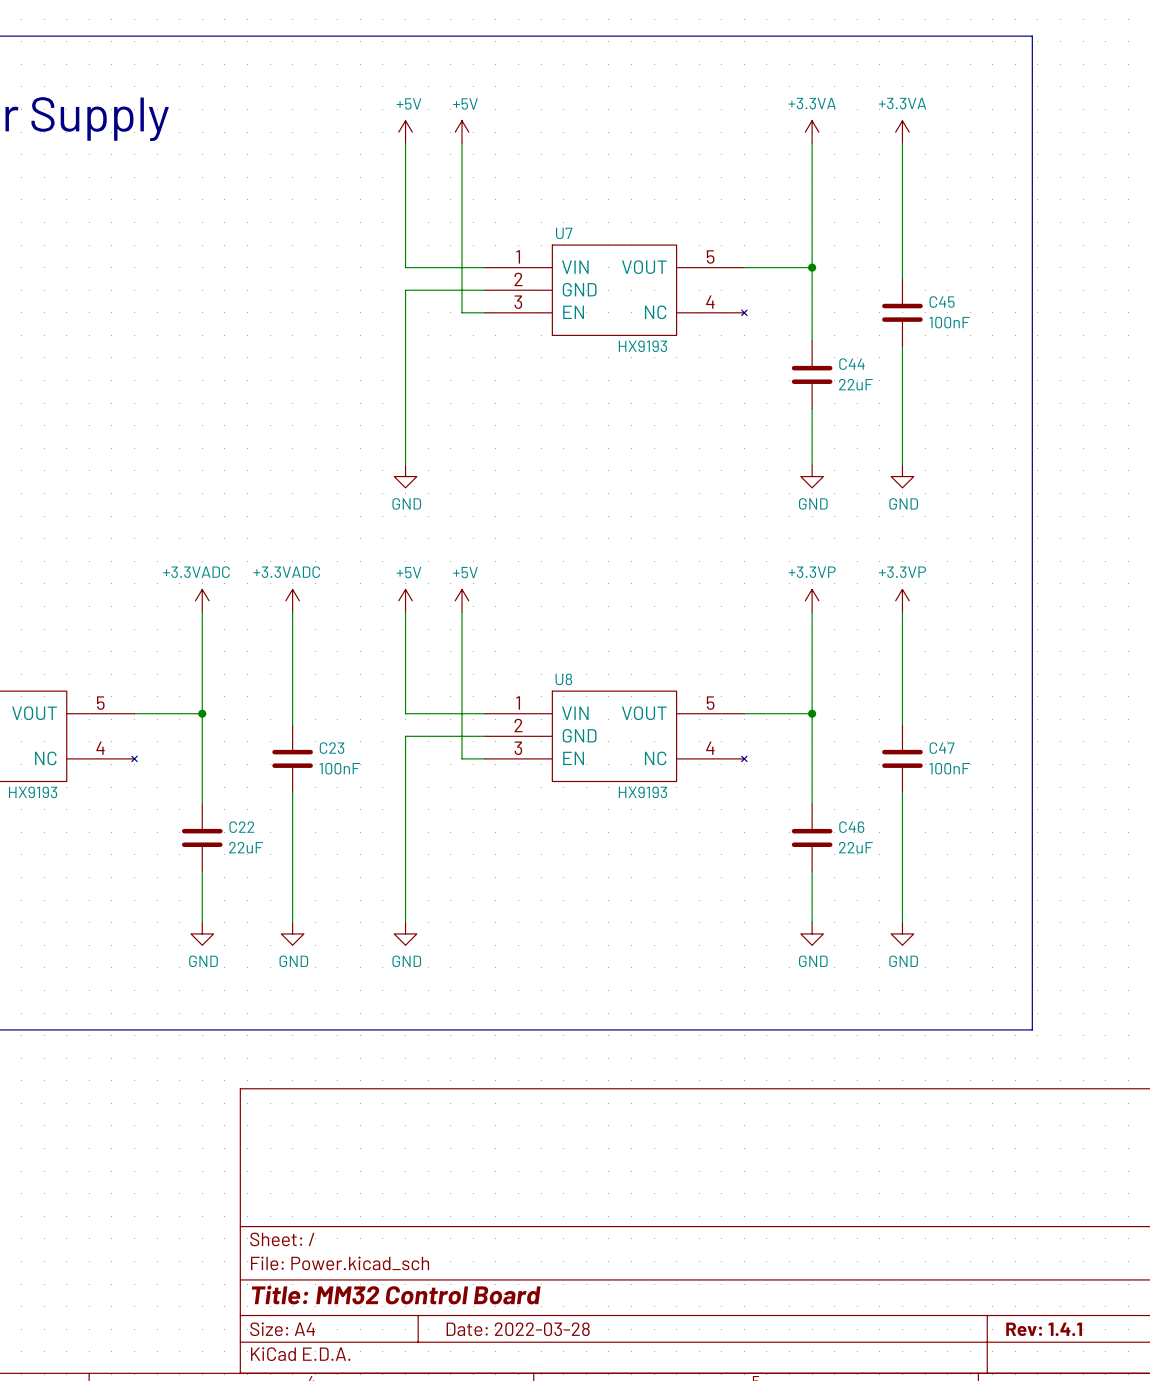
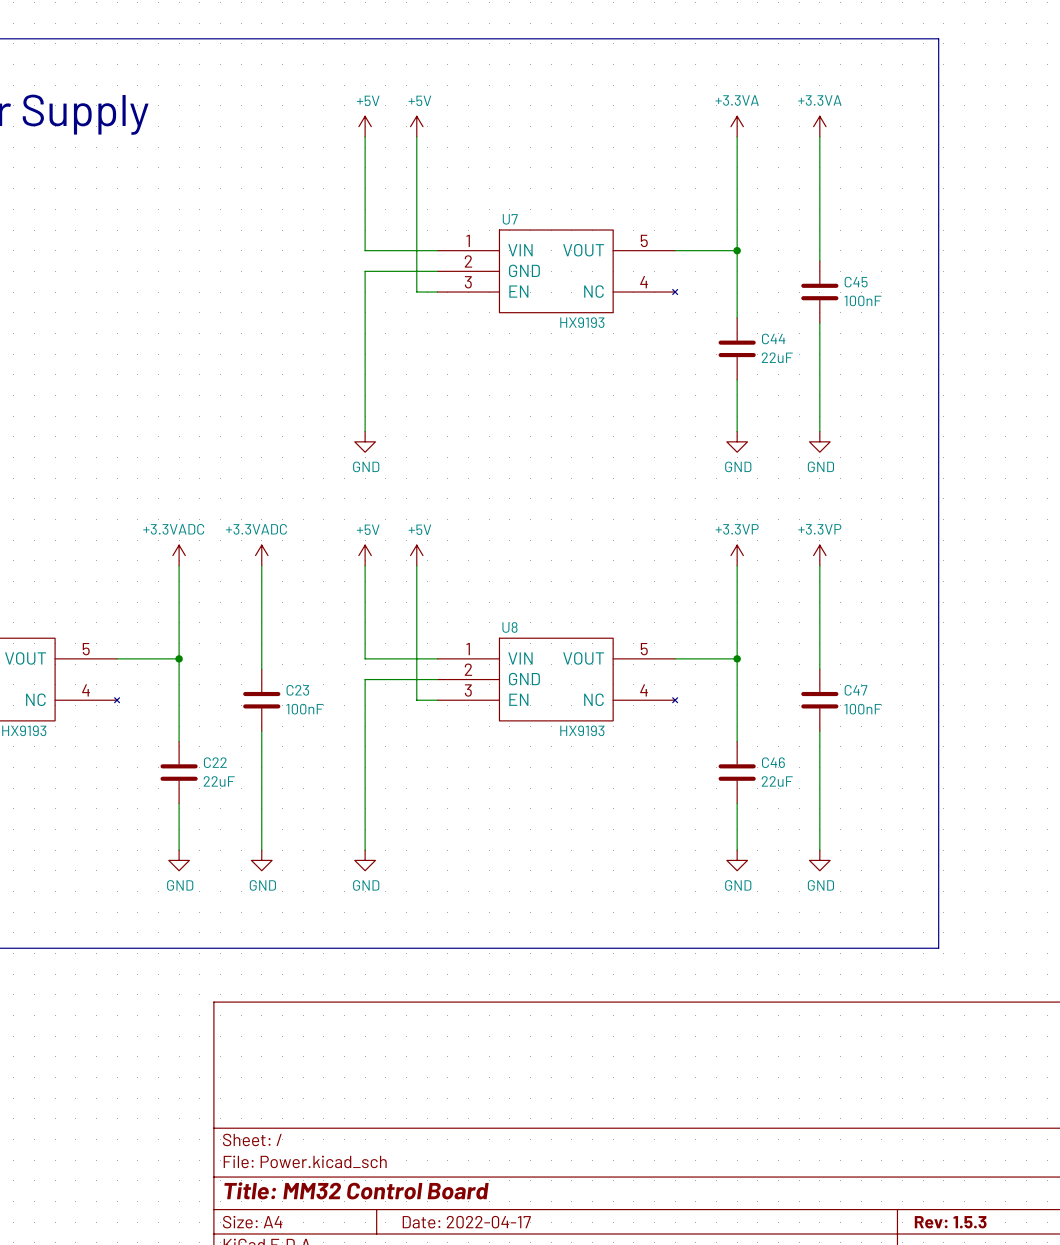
title block: Date: 2022-03-28 (518, 1329) -> Date: 2022-04-17 (466, 1222)
title block: Rev: 1.4.1 (1044, 1329) -> Rev: 1.5.3 (950, 1222)

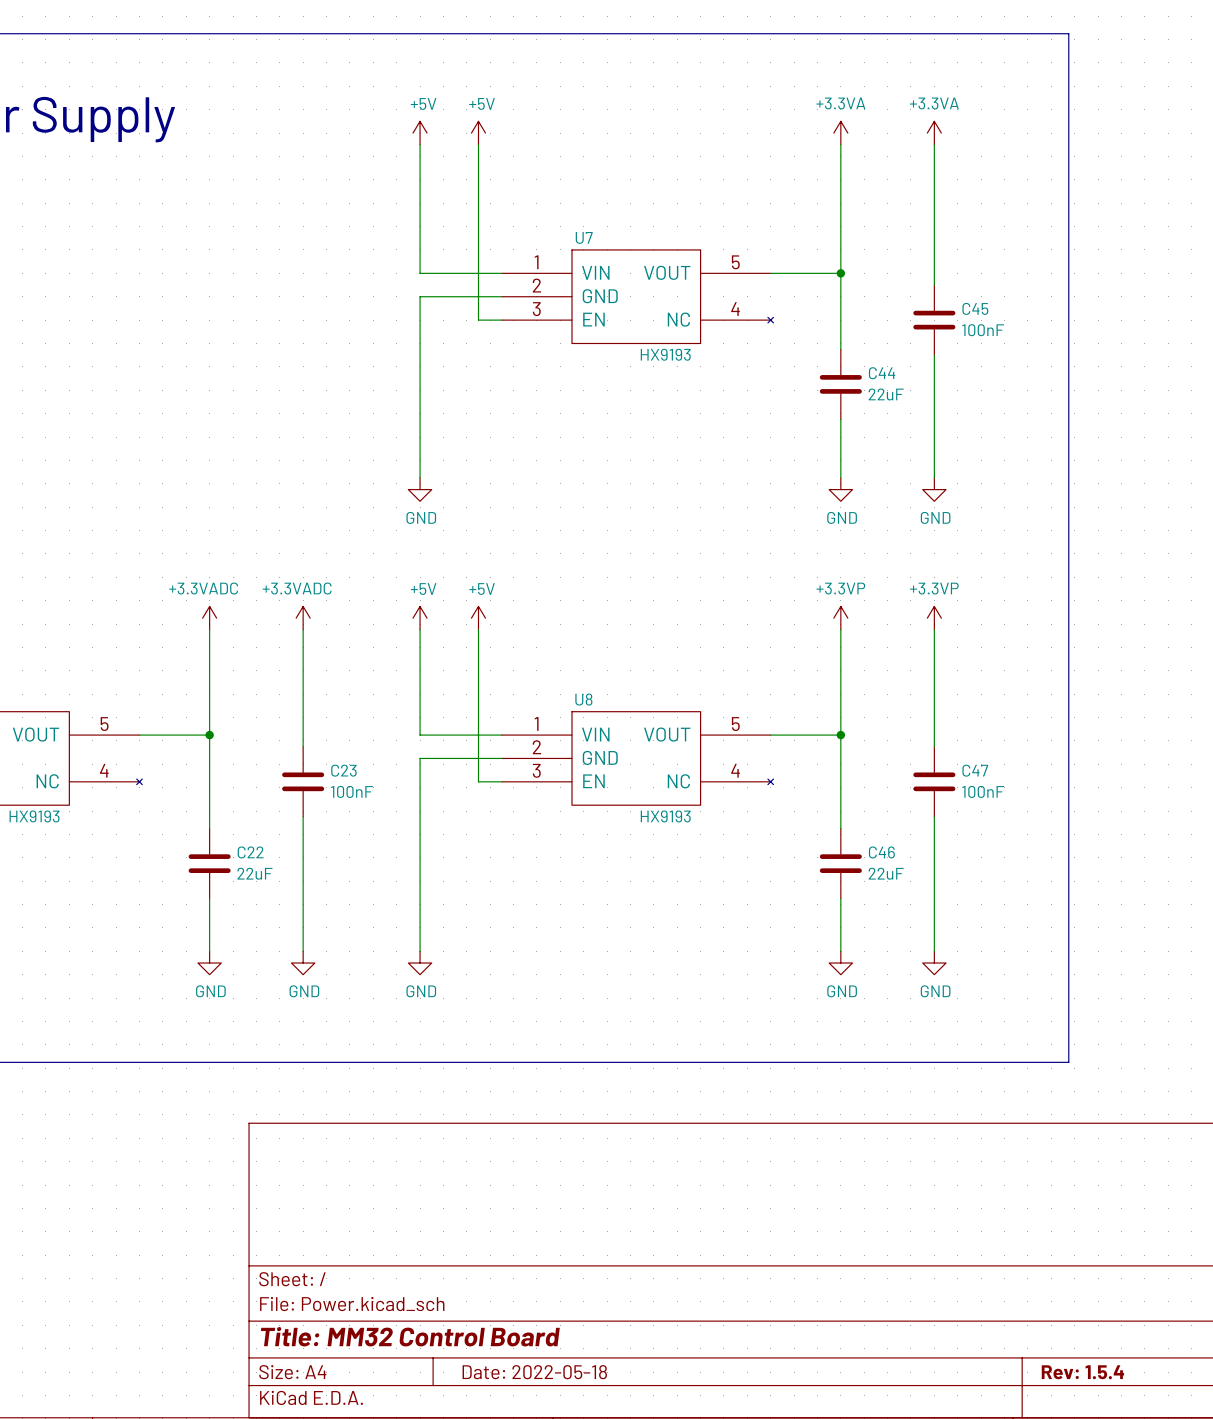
title block: Date: 2022-04-17 (466, 1222) -> Date: 2022-05-18 (534, 1372)
title block: Rev: 1.5.3 (950, 1222) -> Rev: 1.5.4 (1082, 1372)

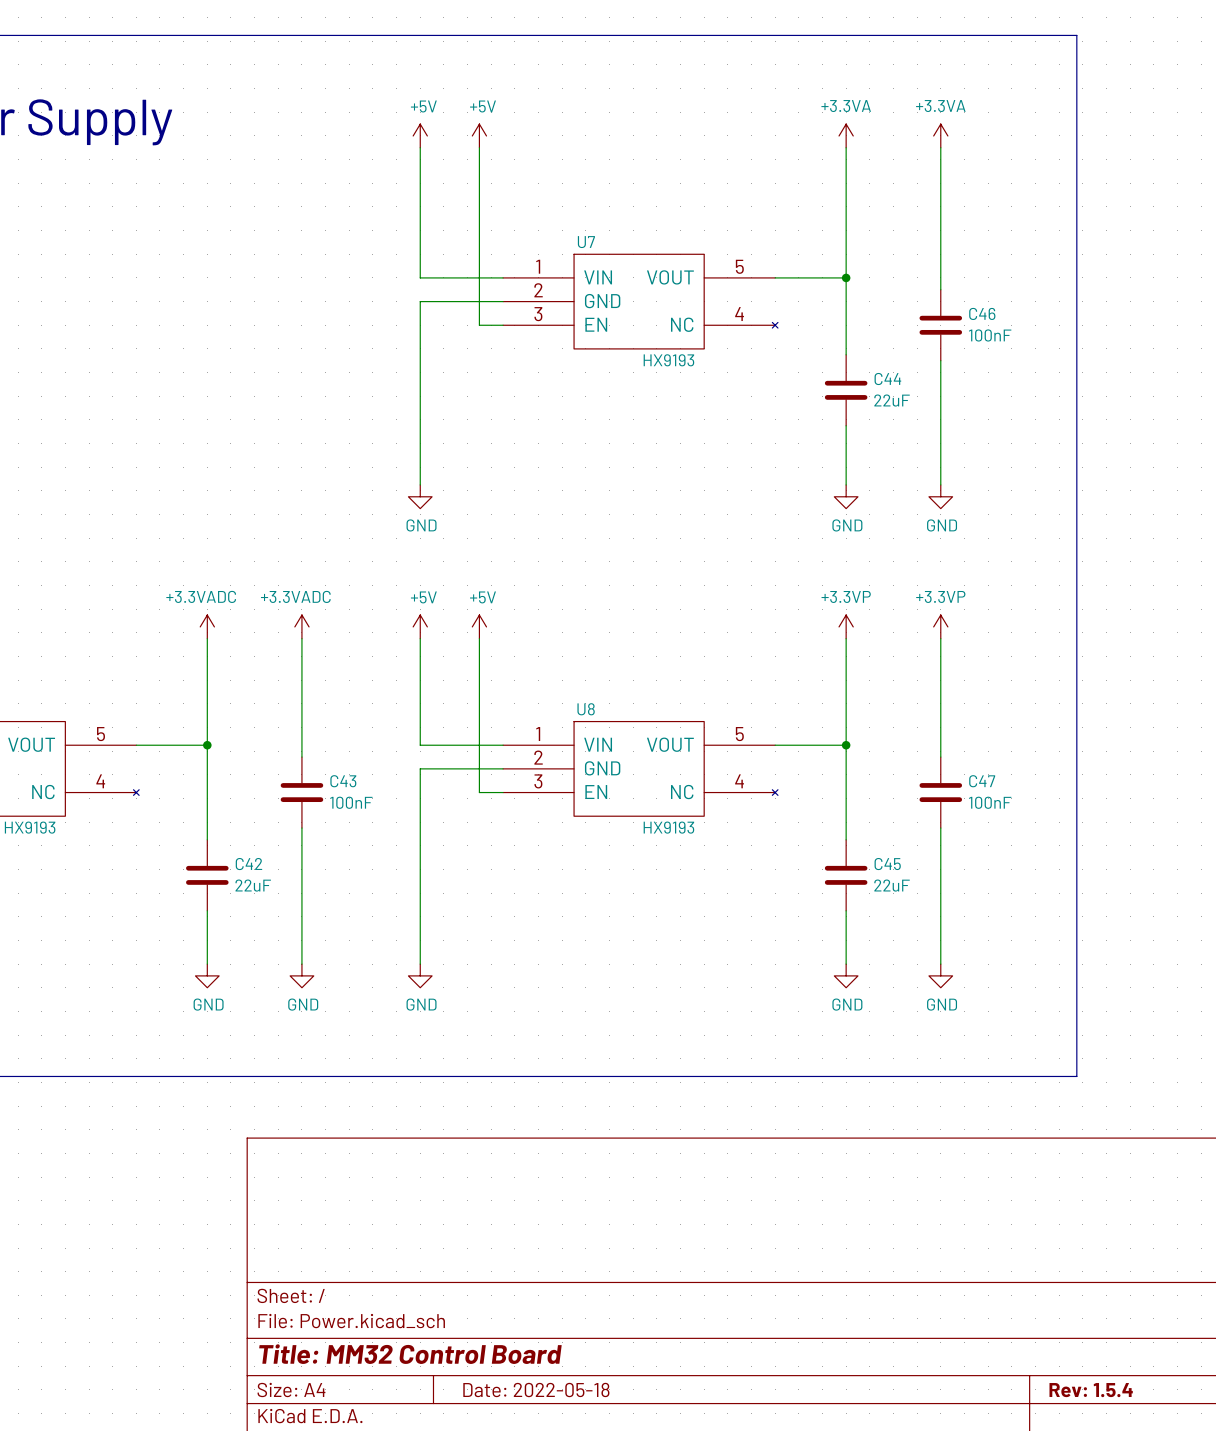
C45 name: C45 (975, 308) -> C46 (982, 313)
C23 name: C23 (343, 770) -> C43 (343, 781)
C22 name: C22 (250, 852) -> C42 (248, 864)
C46 name: C46 (881, 852) -> C45 (887, 864)

